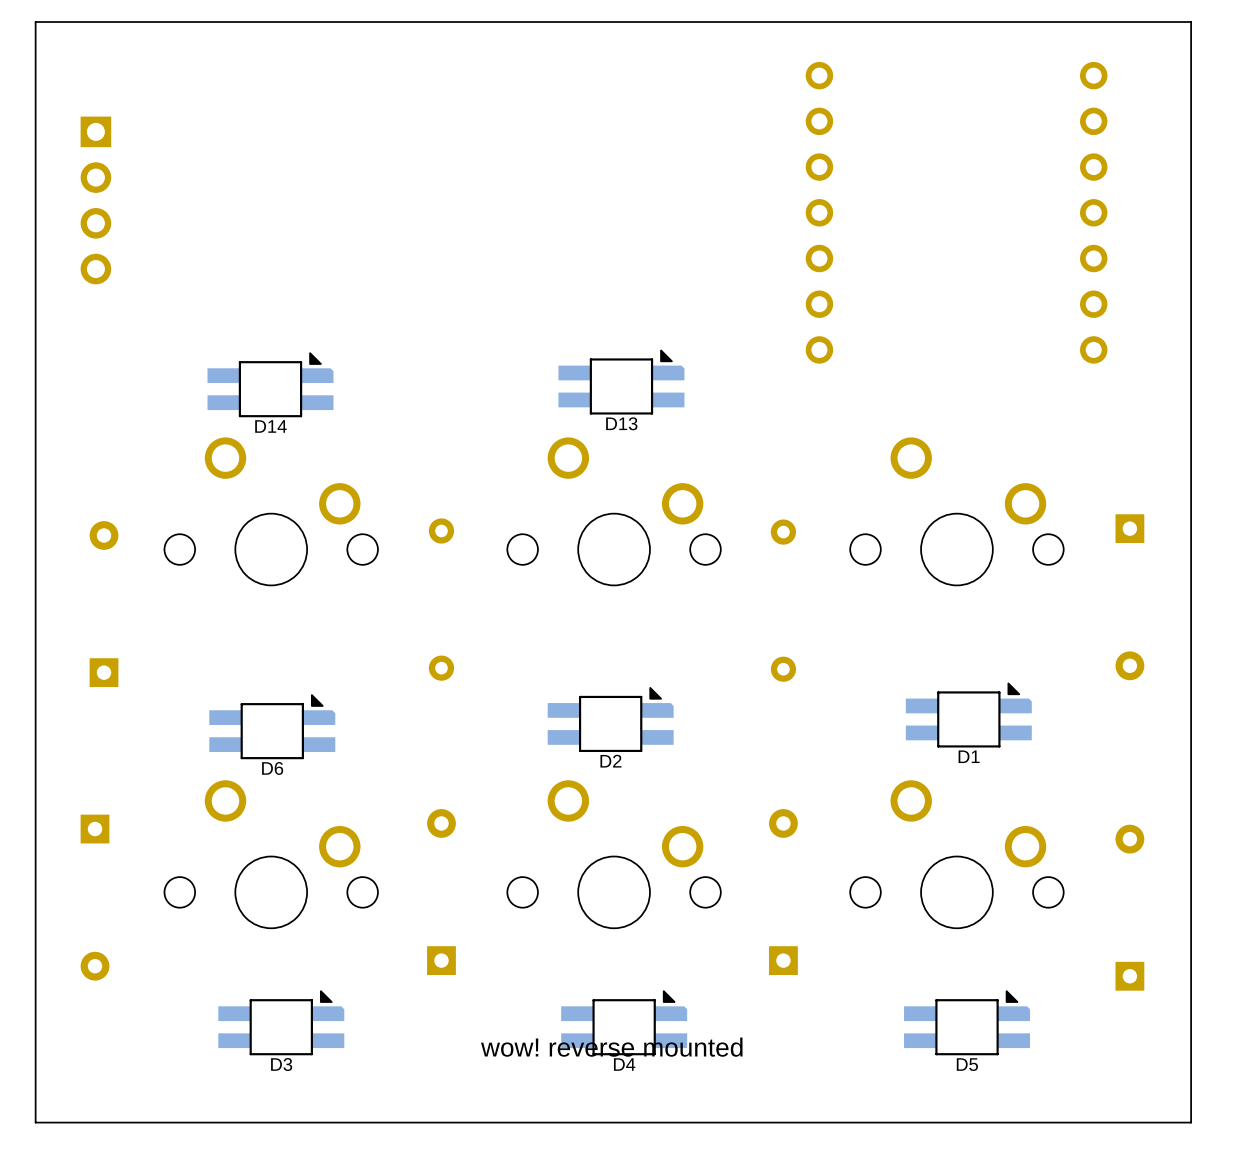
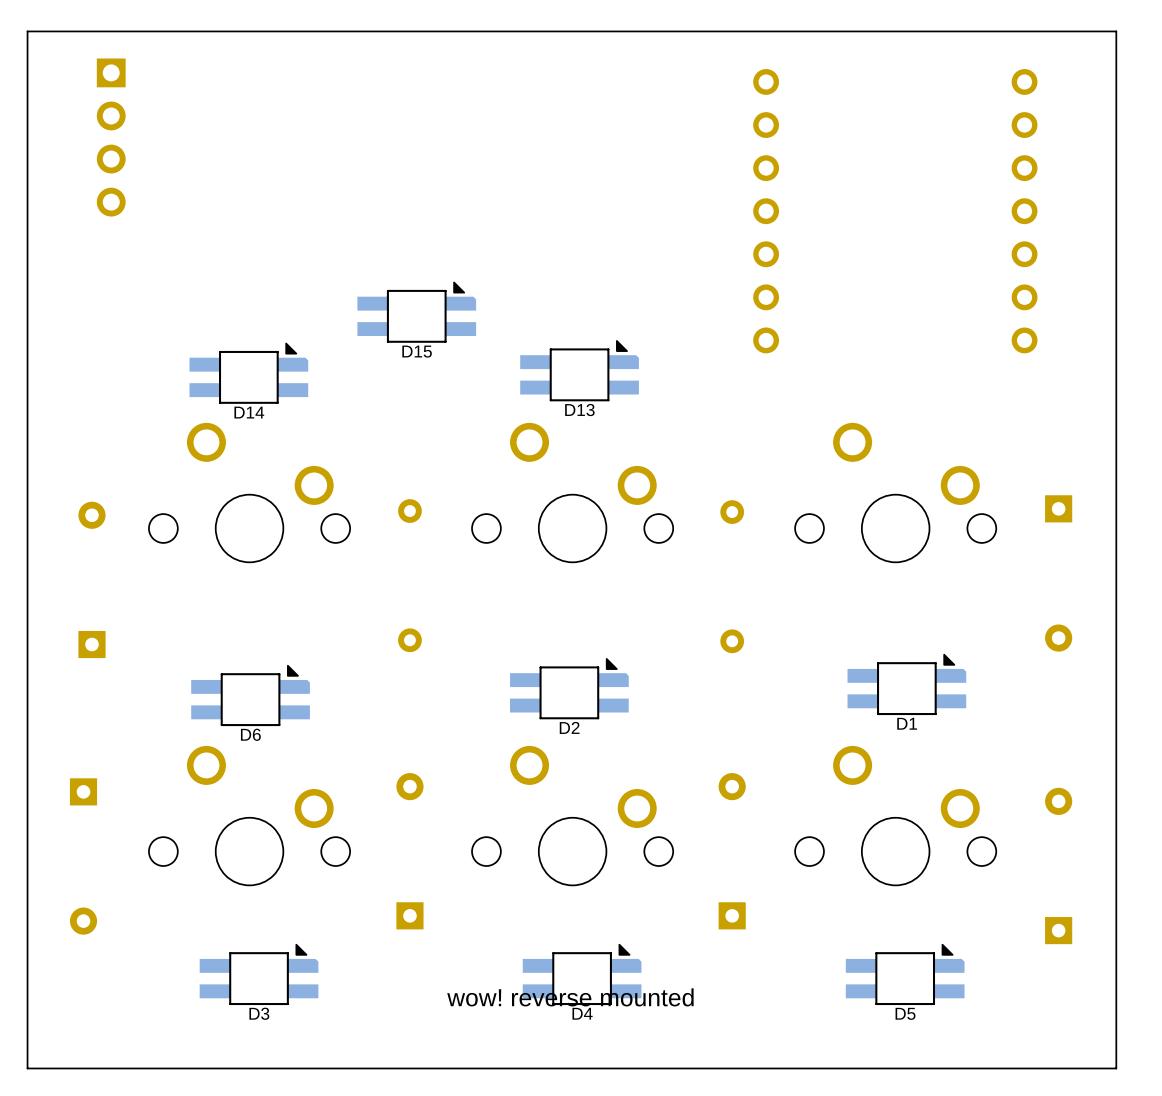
part position: (95, 200) -> (111, 137)
D15: none -> (416, 312)

